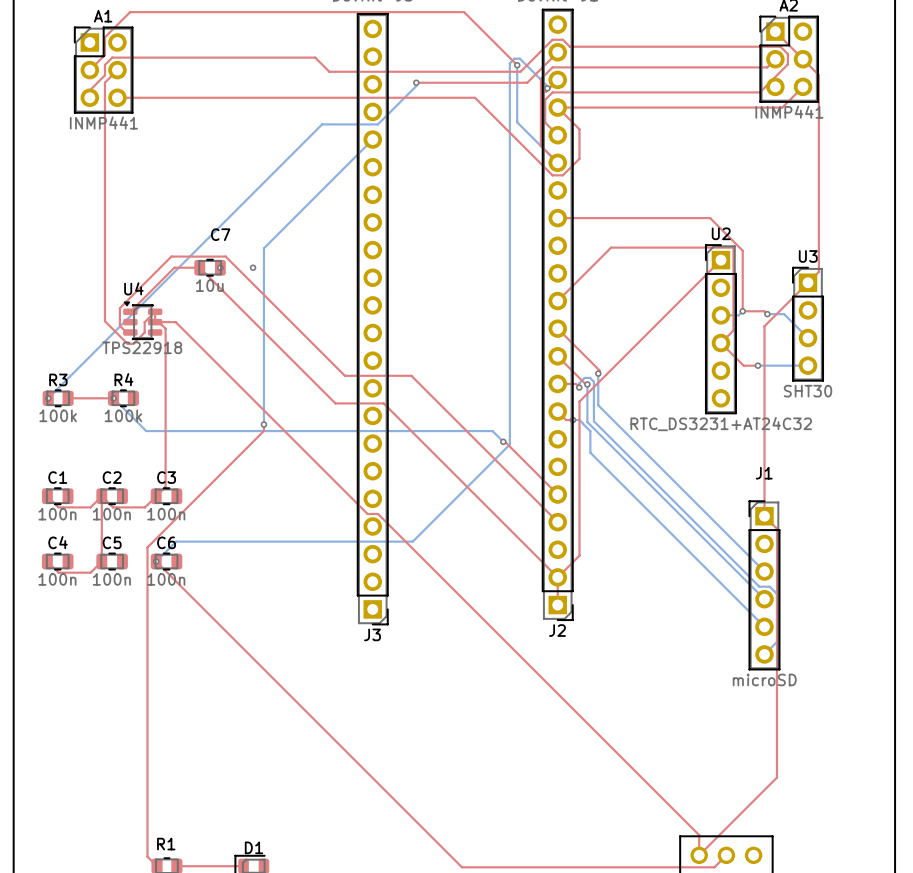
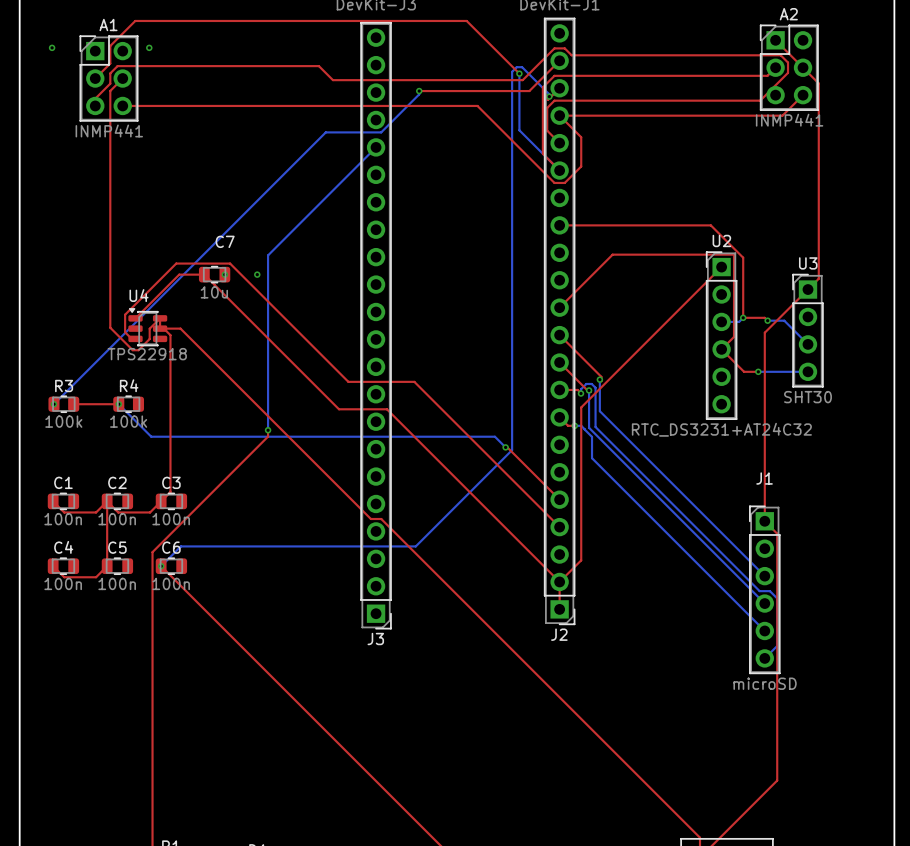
via: none -> (52, 47)
via: none -> (149, 47)

